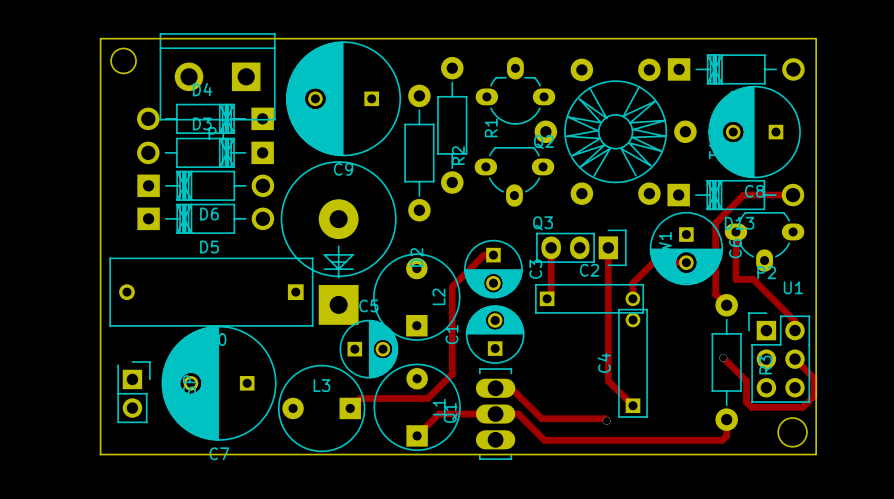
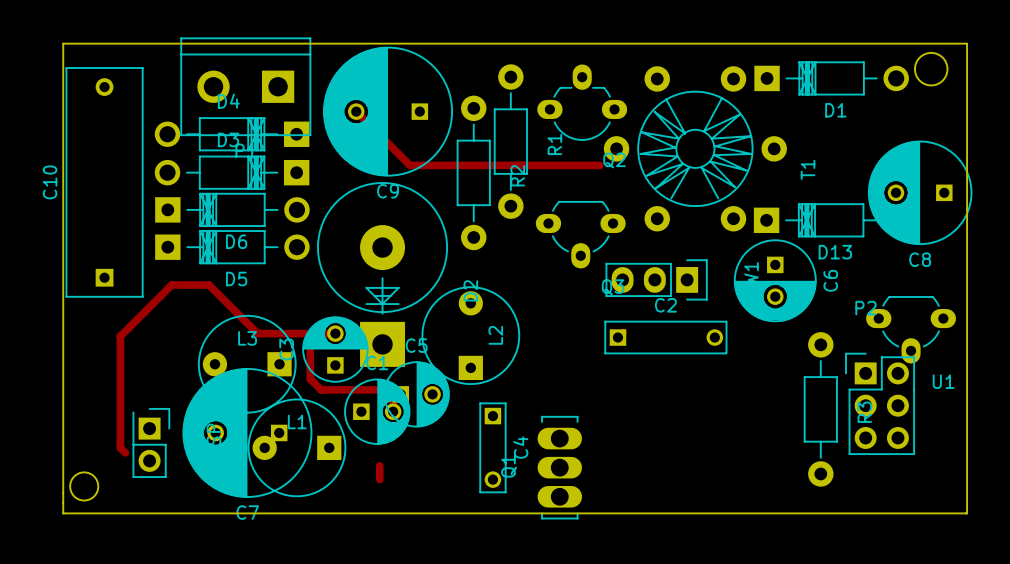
board edge: (100, 38) (100, 454) -> (113, 43) (63, 43) (63, 513) (113, 513)
board edge: (816, 38) (816, 453) -> (921, 43) (967, 43) (967, 513) (921, 513)
round board edge: none -> [914, 51, 949, 87]
round board edge: [110, 47, 137, 75] -> none
track: none -> (356, 111) (410, 165) (599, 165)
C8 position: (754, 132) -> (920, 192)
Q3 position: (514, 176) -> (580, 234)
track: (792, 195) (743, 195) (715, 223) (715, 294) (726, 305) -> none
track: (735, 231) (735, 279) (753, 279) (794, 321) (794, 330) -> none
U1 position: (764, 241) -> (911, 329)
track: (551, 247) (551, 294) -> none
track: (608, 247) (608, 381) (633, 405) -> none
track: (493, 255) (484, 255) (452, 286) (452, 374) (427, 398) (360, 398) (350, 408) -> none
track: (686, 262) (653, 262) (632, 283) (632, 298) -> none
C3 rotation: 0° (493, 269) -> 180° (335, 349)
C3 position: (493, 269) -> (335, 349)
C10 rotation: 0° (211, 292) -> 90° clockwise (104, 182)
C10 position: (211, 292) -> (104, 182)
track: none -> (319, 333) (310, 342) (310, 379) (321, 389) (381, 389) (393, 401) (393, 411)
track: none -> (335, 333) (257, 333) (209, 285) (171, 285) (120, 336)
track: none -> (120, 336) (120, 447) (125, 452)
C4 footprint: [618, 308, 648, 418] -> [479, 402, 507, 494]
C1 rotation: 0° (495, 334) -> 90° clockwise (377, 411)
C1 position: (495, 334) -> (377, 411)
track: (723, 357) (746, 381) (746, 402) (751, 407) (802, 407) (814, 396) (814, 378) (794, 359) -> none
via: (723, 357) -> none
C4 name position: C4 (604, 363) -> C4 (520, 447)
track: (495, 388) (511, 388) (541, 418) (604, 418) (606, 420) -> none
L1 rotation: 0° (417, 407) -> 90° counterclockwise (296, 447)
L1 position: (417, 407) -> (296, 447)
L3 position: (321, 408) -> (247, 364)
track: none -> (379, 465) (379, 479)
round board edge: none -> [69, 471, 100, 502]
round board edge: [777, 417, 808, 448] -> none
track: (726, 419) (726, 436) (722, 440) (544, 440) (518, 414) (438, 414) (417, 435) -> none
via: (606, 420) -> none

